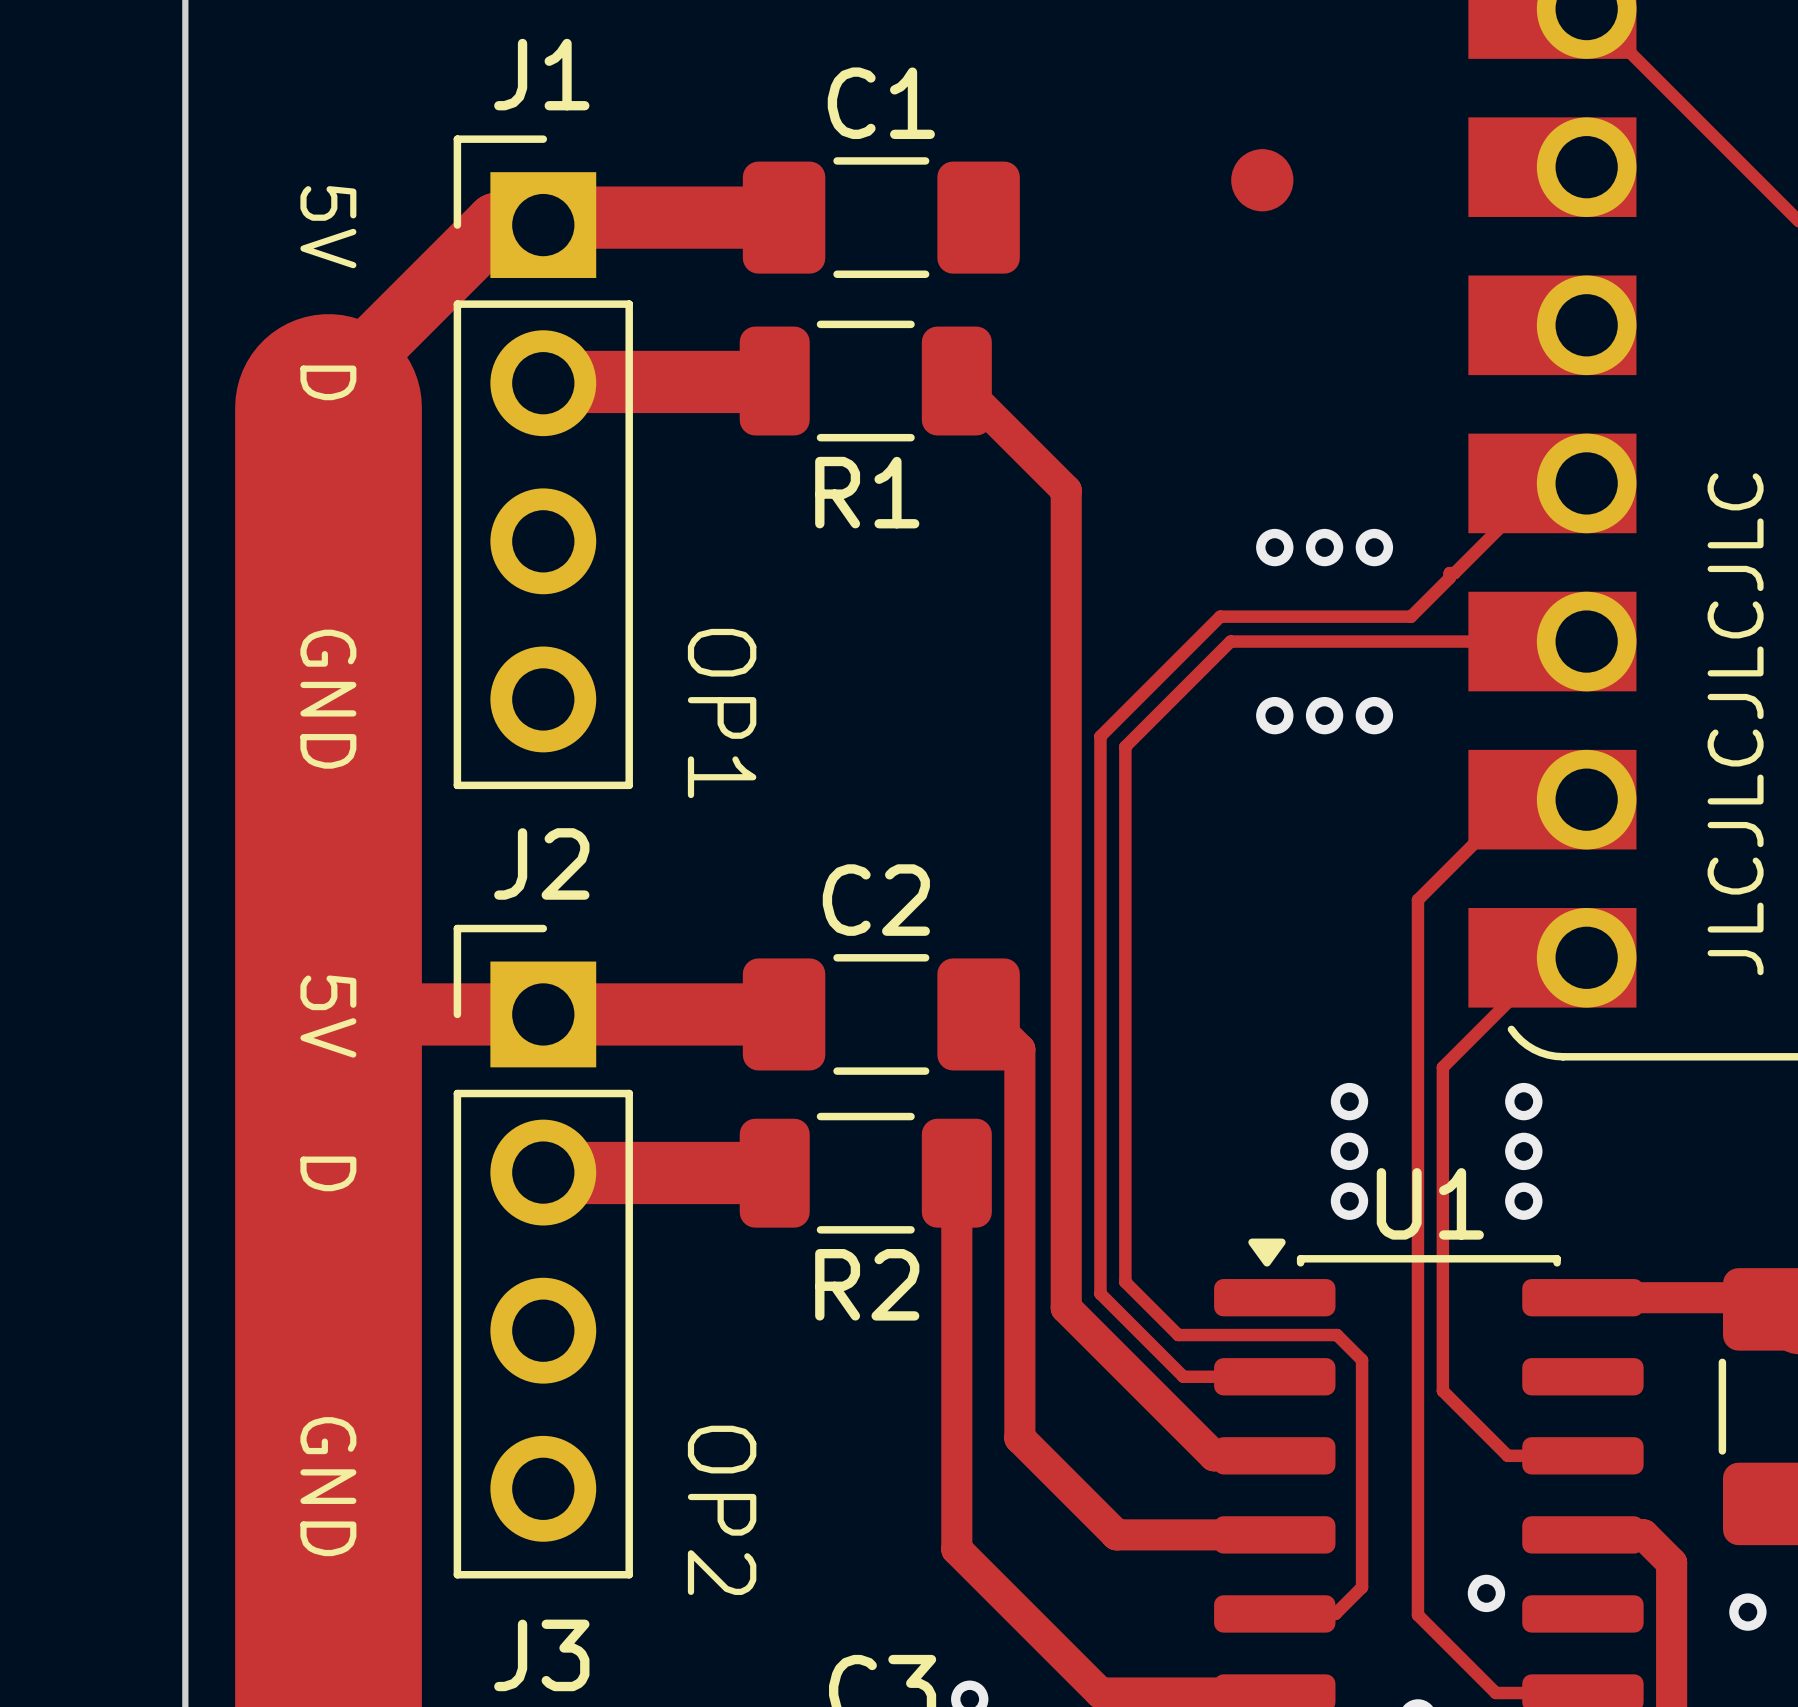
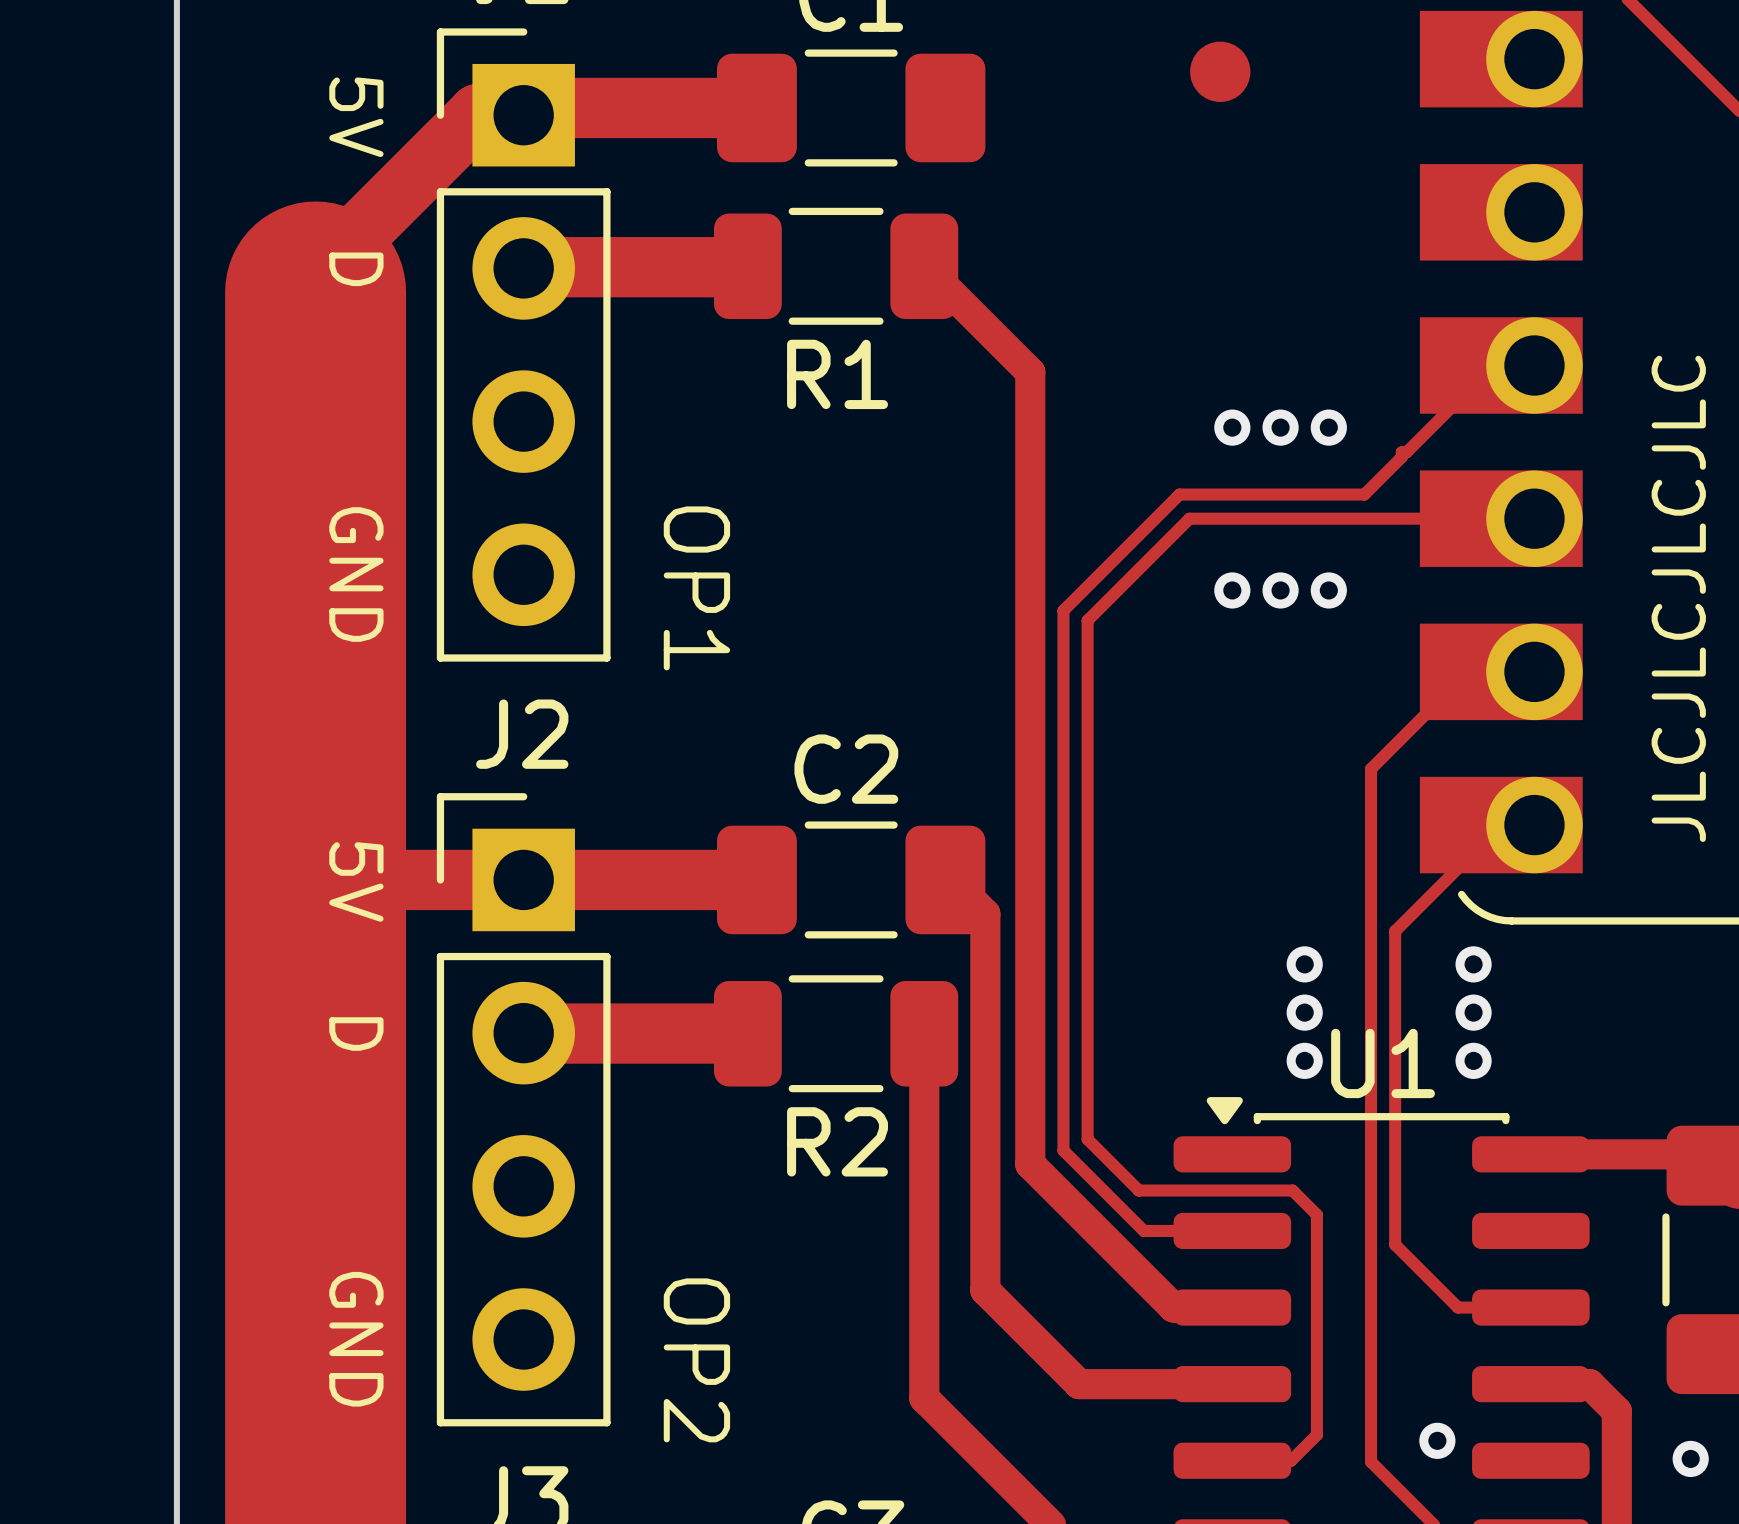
text position: 5V (328, 227) -> 5V (356, 117)
text position: D (328, 382) -> D (356, 269)
text position: GND (328, 699) -> GND (356, 574)
text position: 5V (328, 1016) -> 5V (356, 881)
text position: D (328, 1173) -> D (356, 1034)
text position: GND (328, 1486) -> GND (356, 1339)

